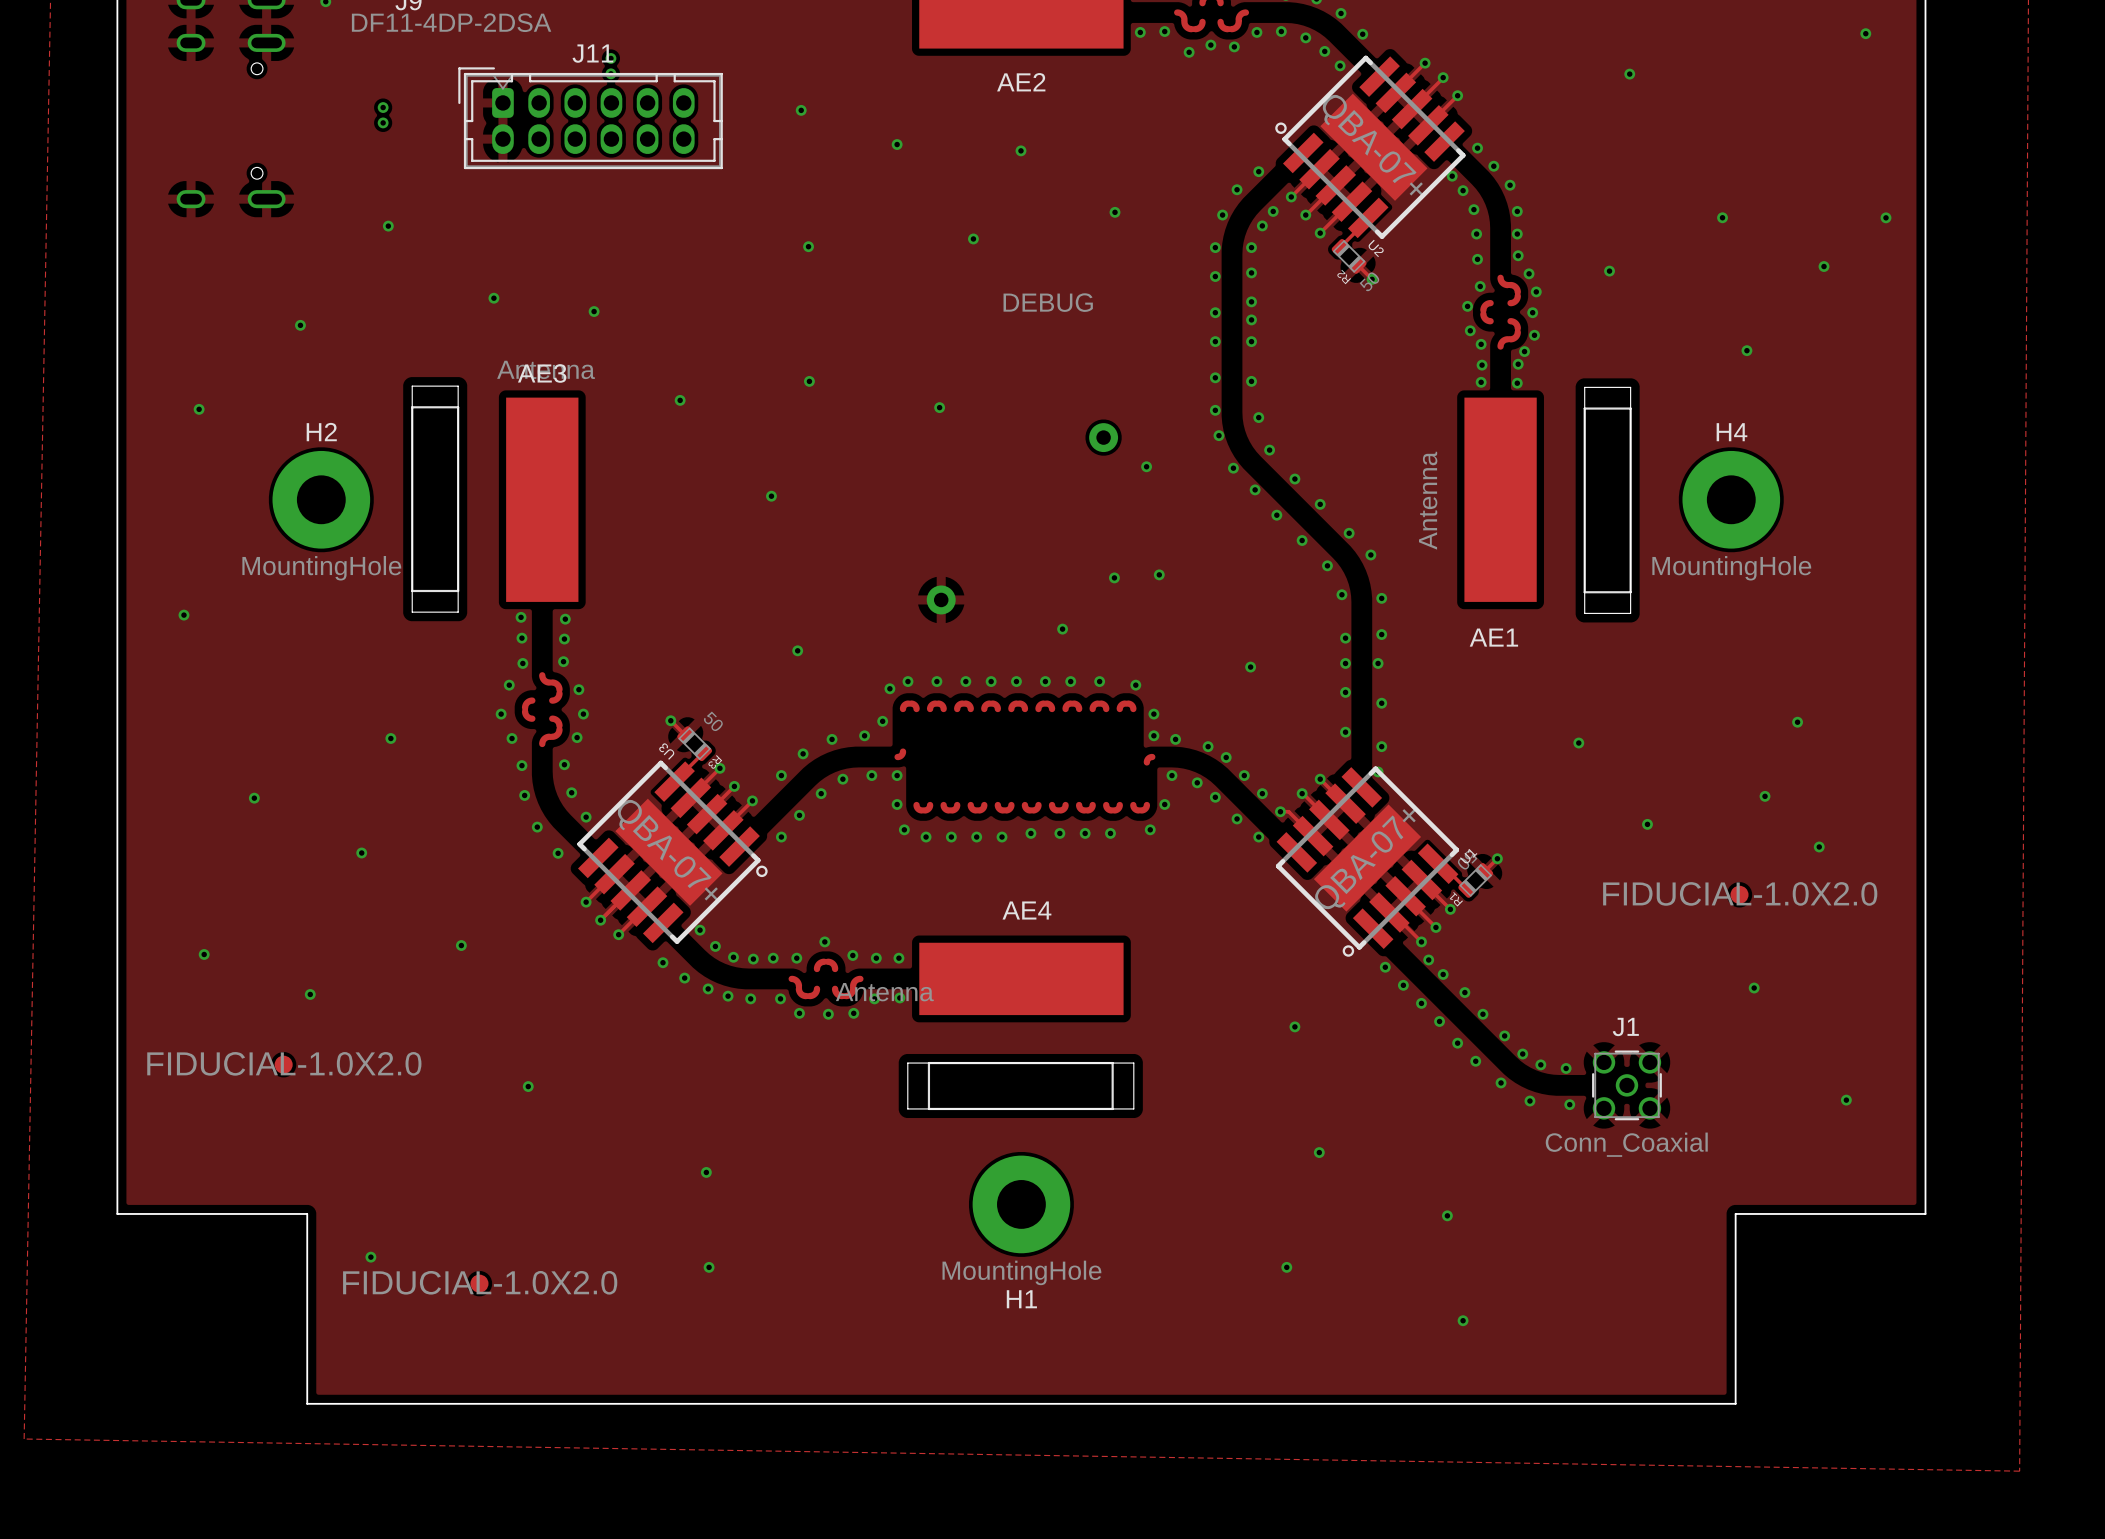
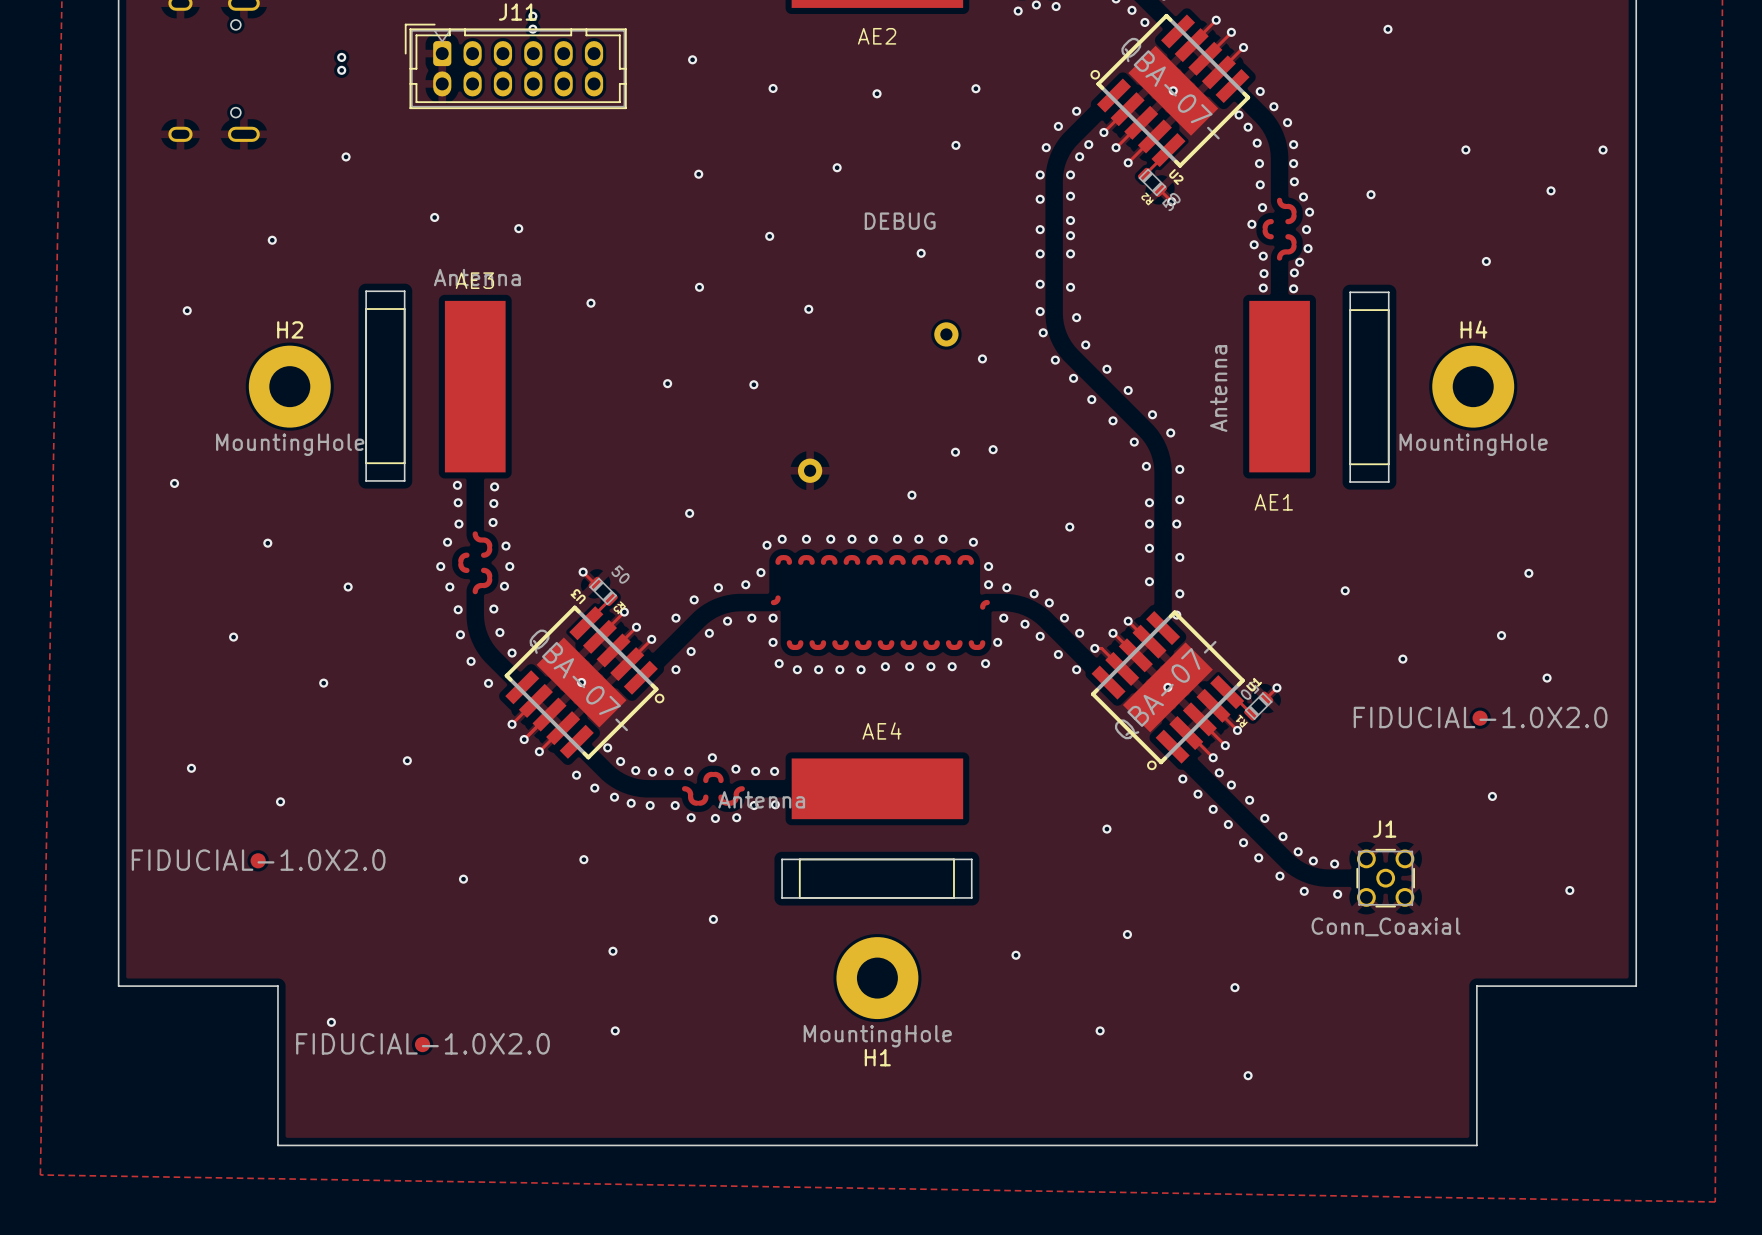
via: none -> (975, 88)
via: none -> (1173, 90)
via: none -> (769, 236)
via: none -> (921, 253)
via: none -> (753, 384)
via: none -> (267, 543)
via: none -> (581, 682)
via: none -> (1167, 687)
via: none -> (583, 859)
via: none -> (713, 919)
via: none -> (1016, 955)

